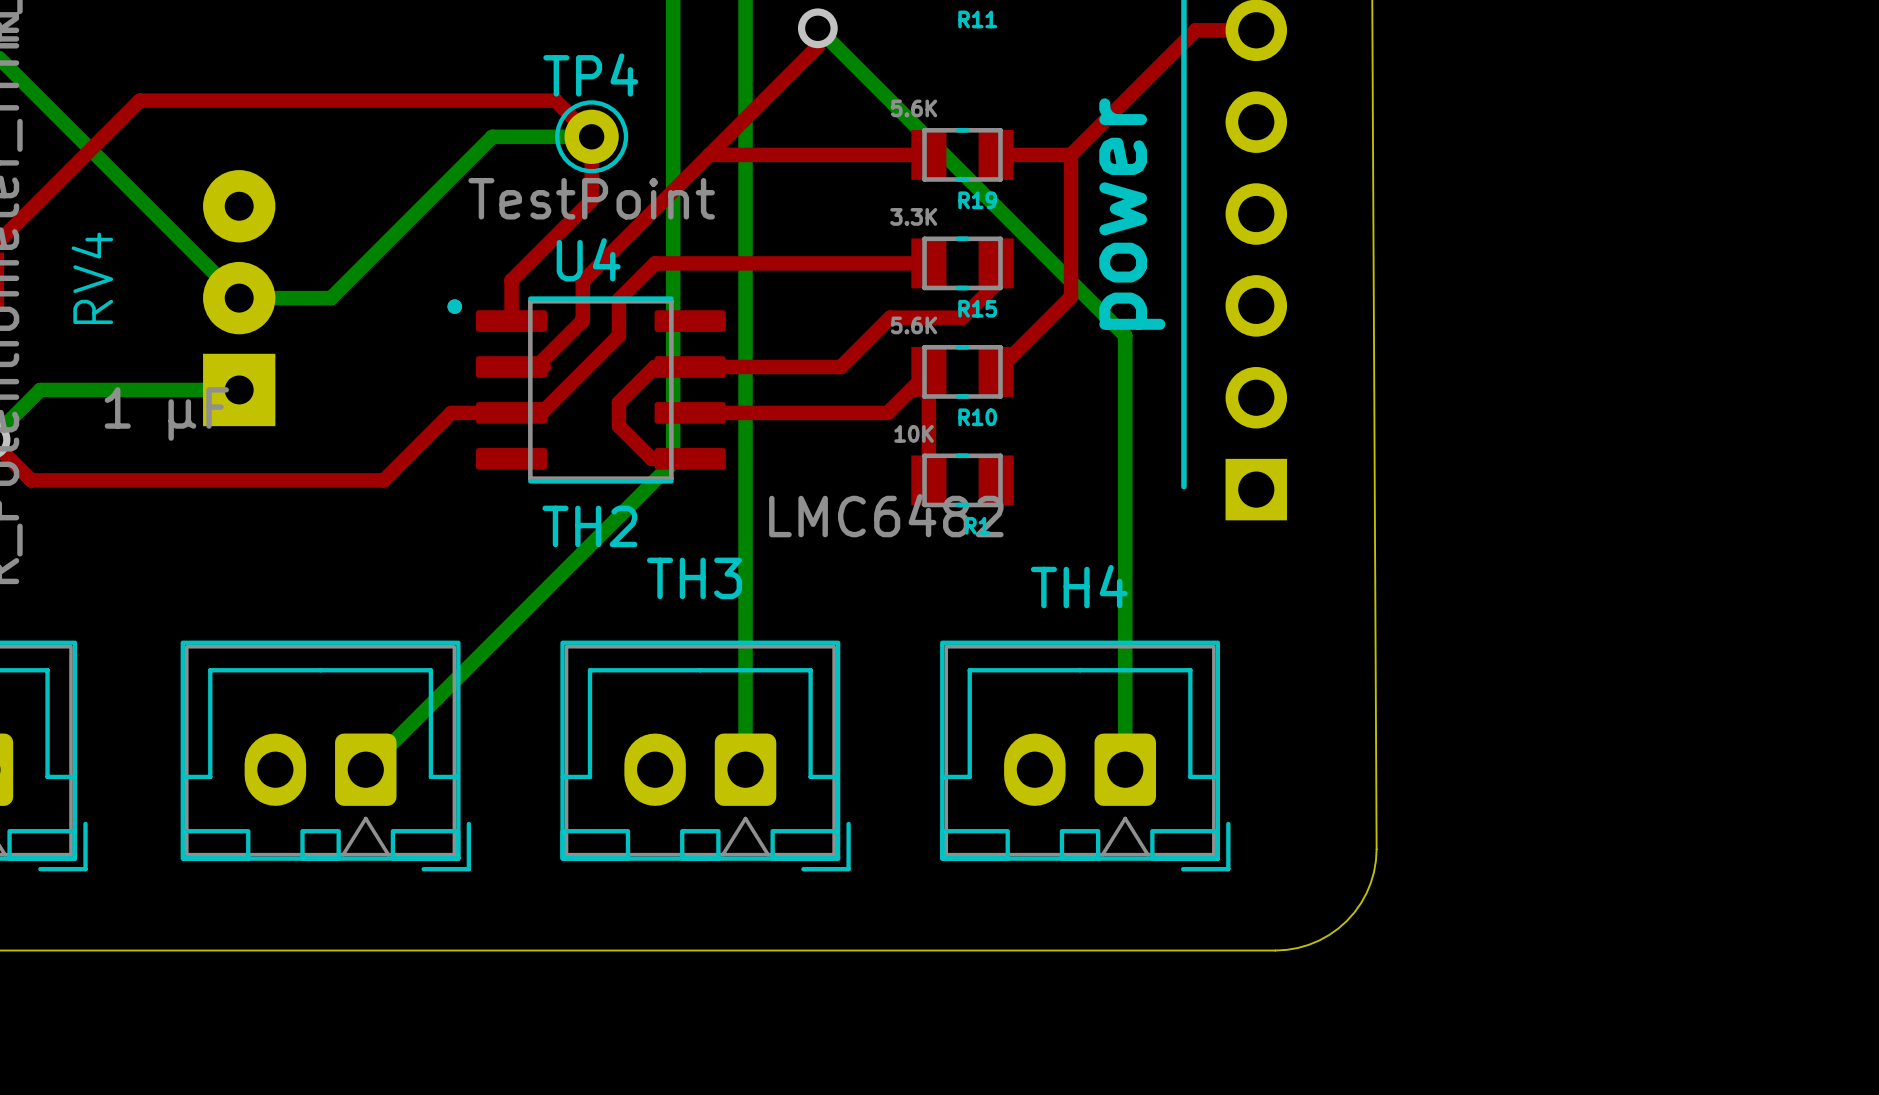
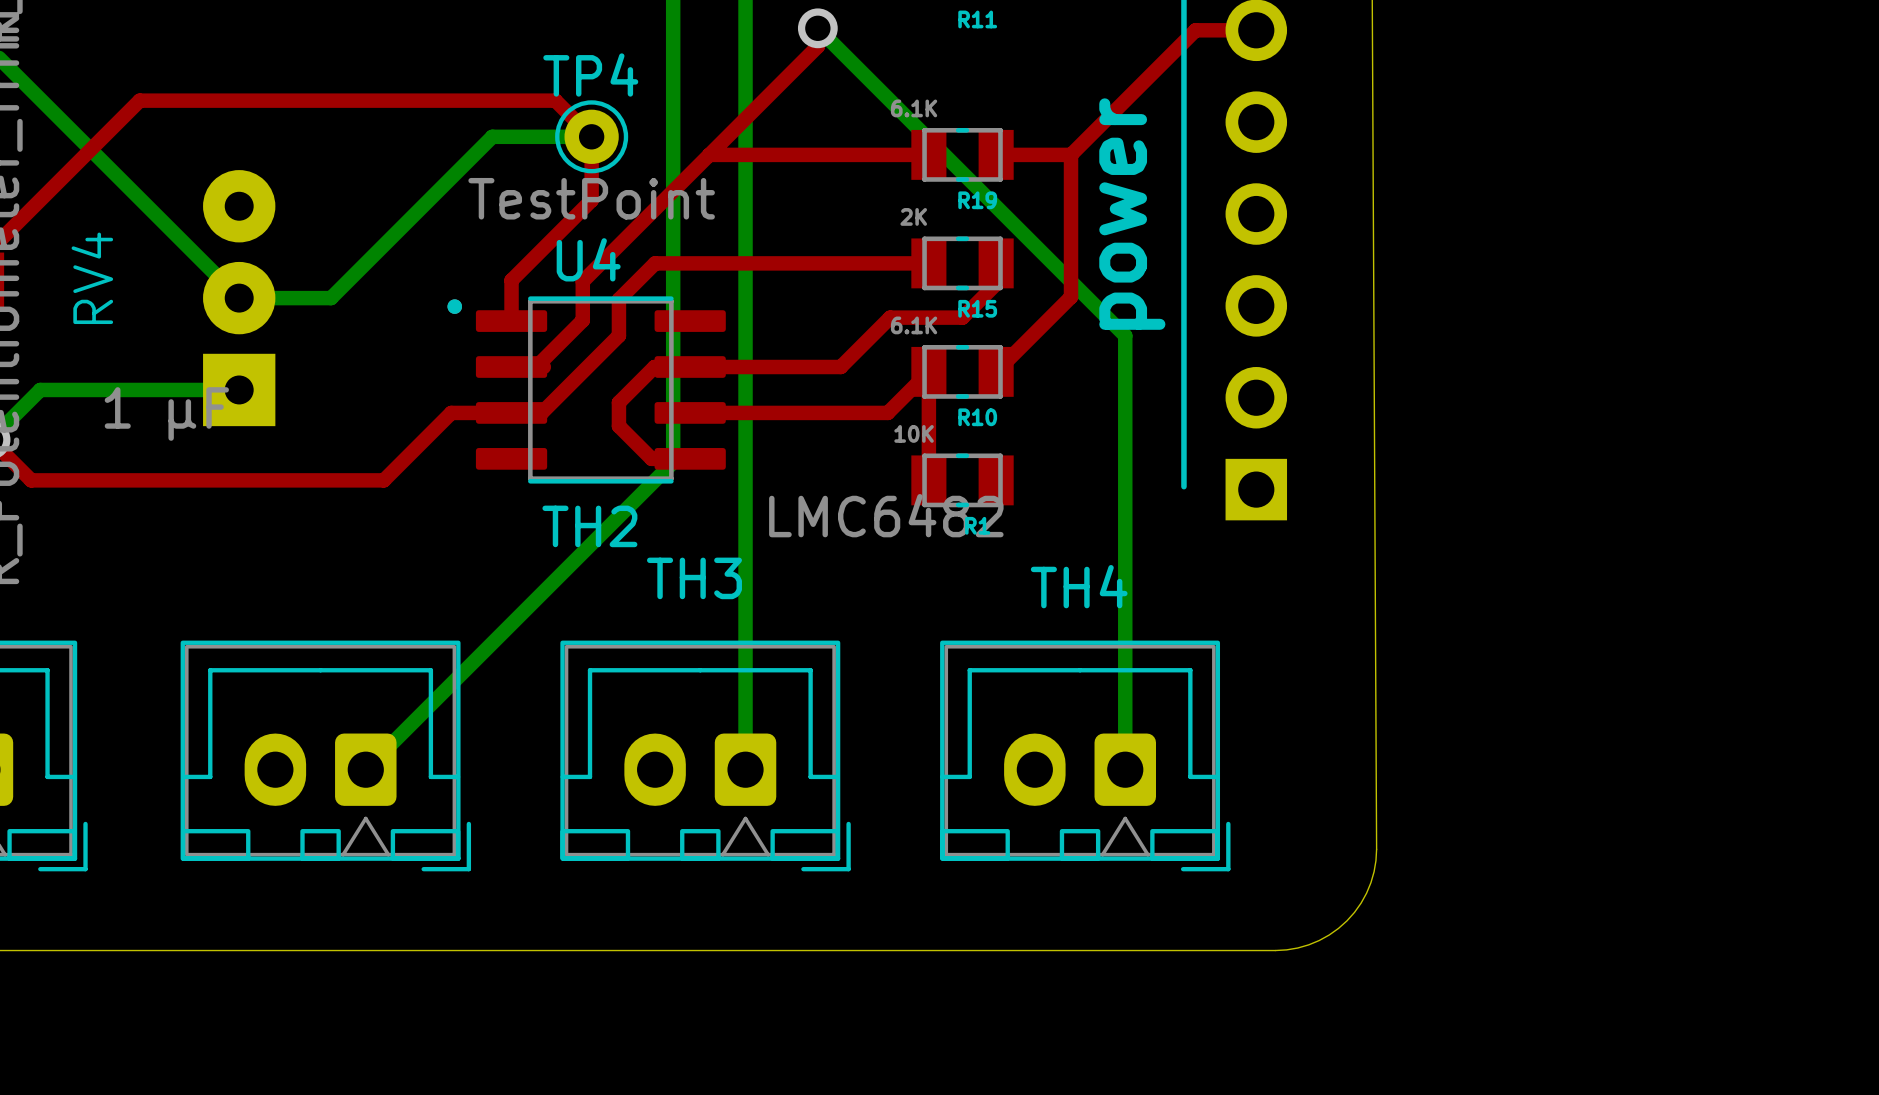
R19 value: 5.6K (914, 108) -> 6.1K (914, 108)
R15 value: 3.3K (913, 216) -> 2K (913, 216)
R10 value: 5.6K (914, 325) -> 6.1K (914, 325)

